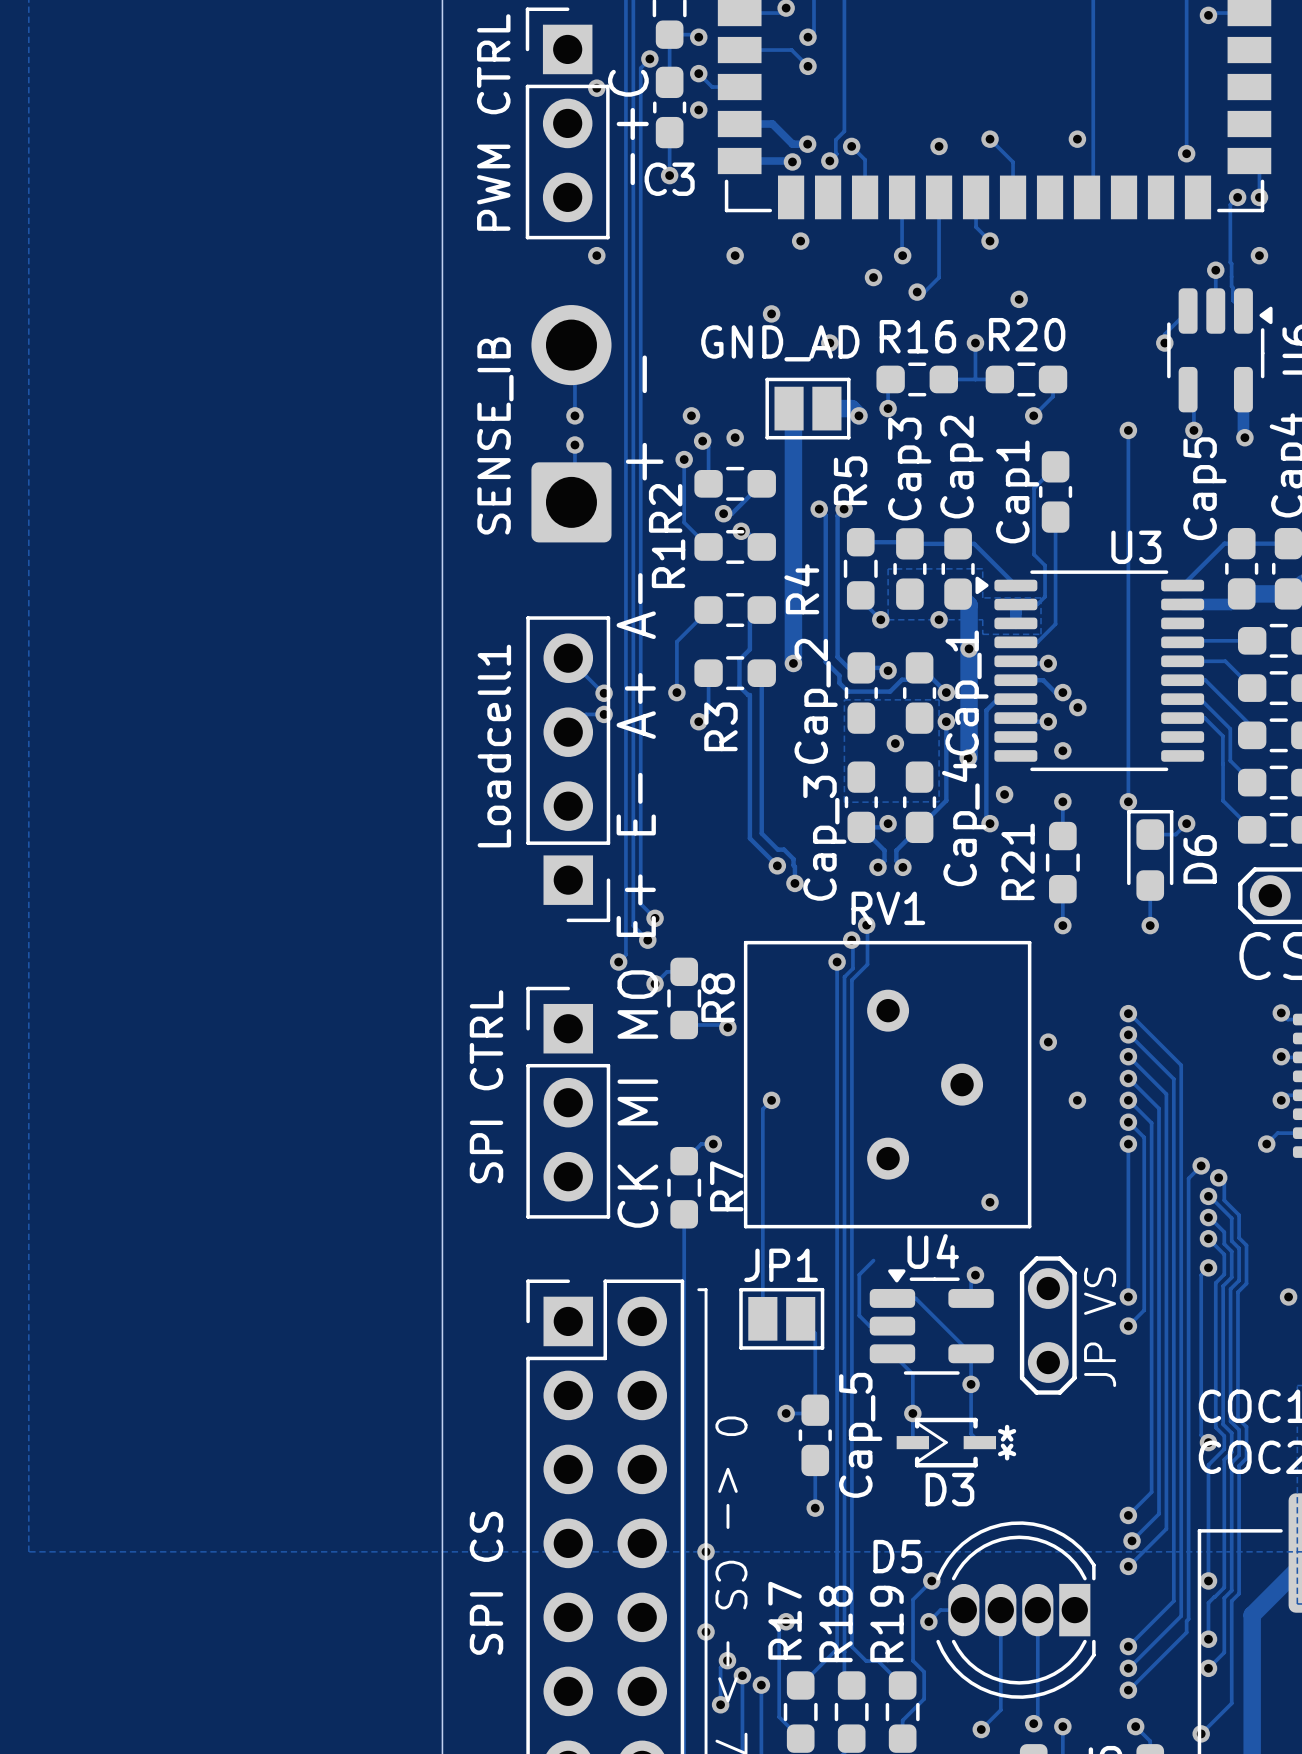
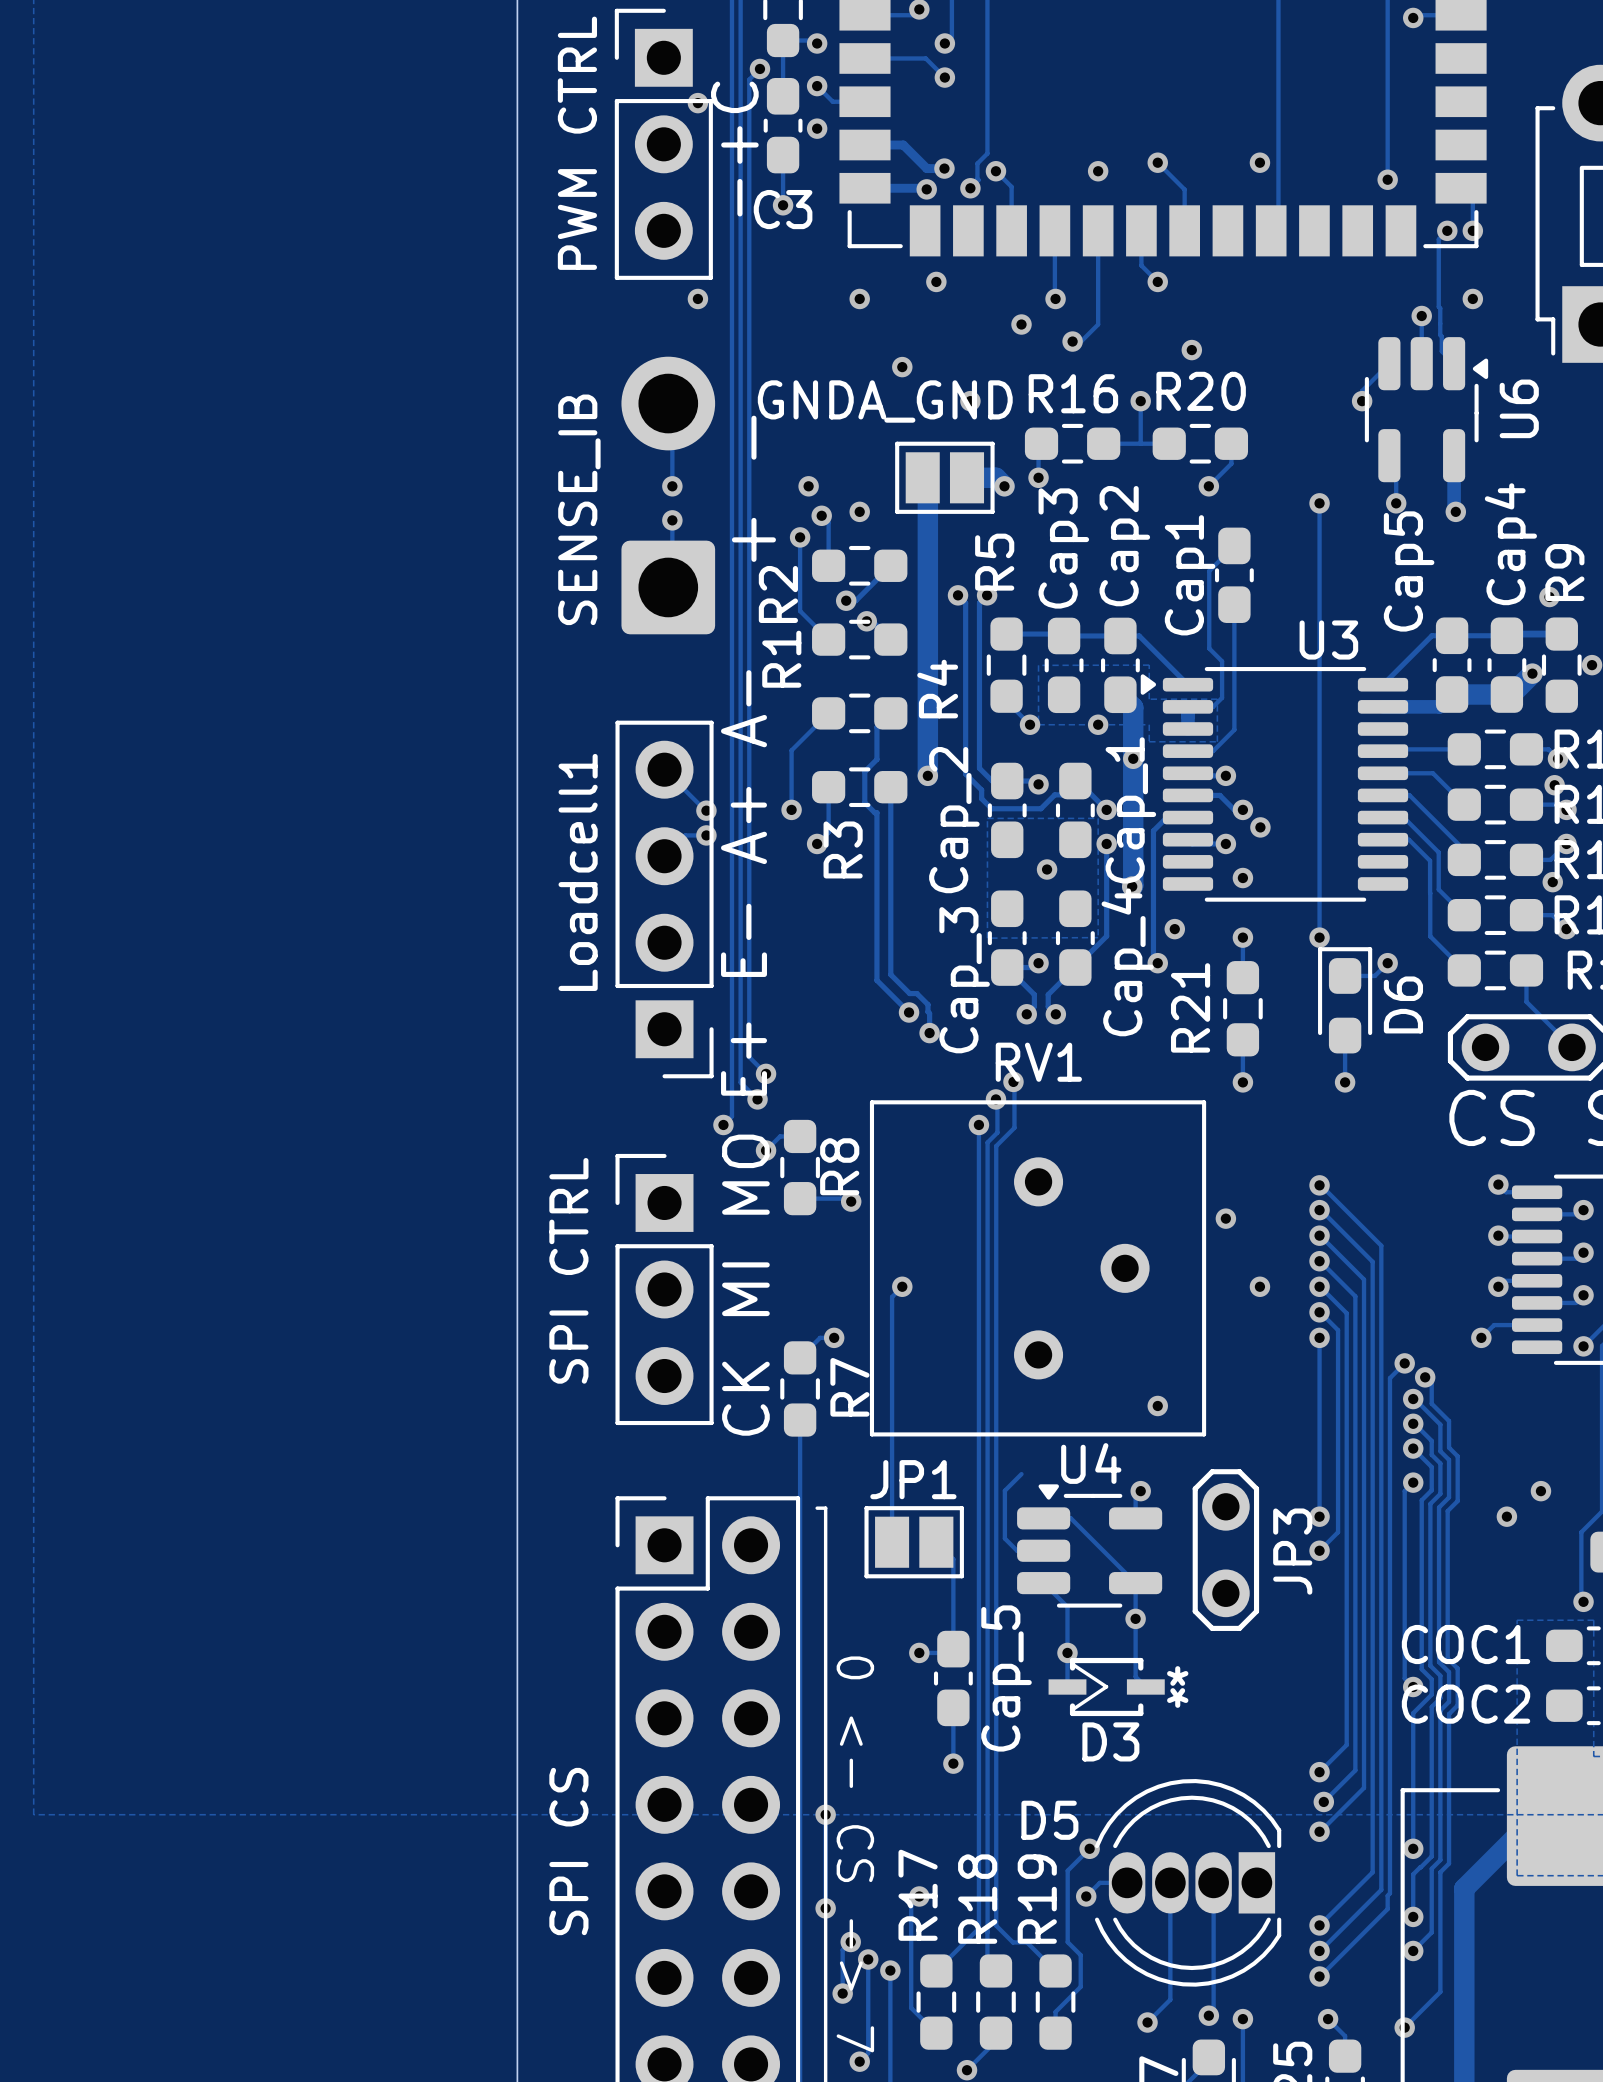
part value: GND_AD (780, 343) -> GNDA_GND (885, 401)
JP3 name: none -> JP3 (1292, 1551)
text: JP VS (1100, 1327) -> none

